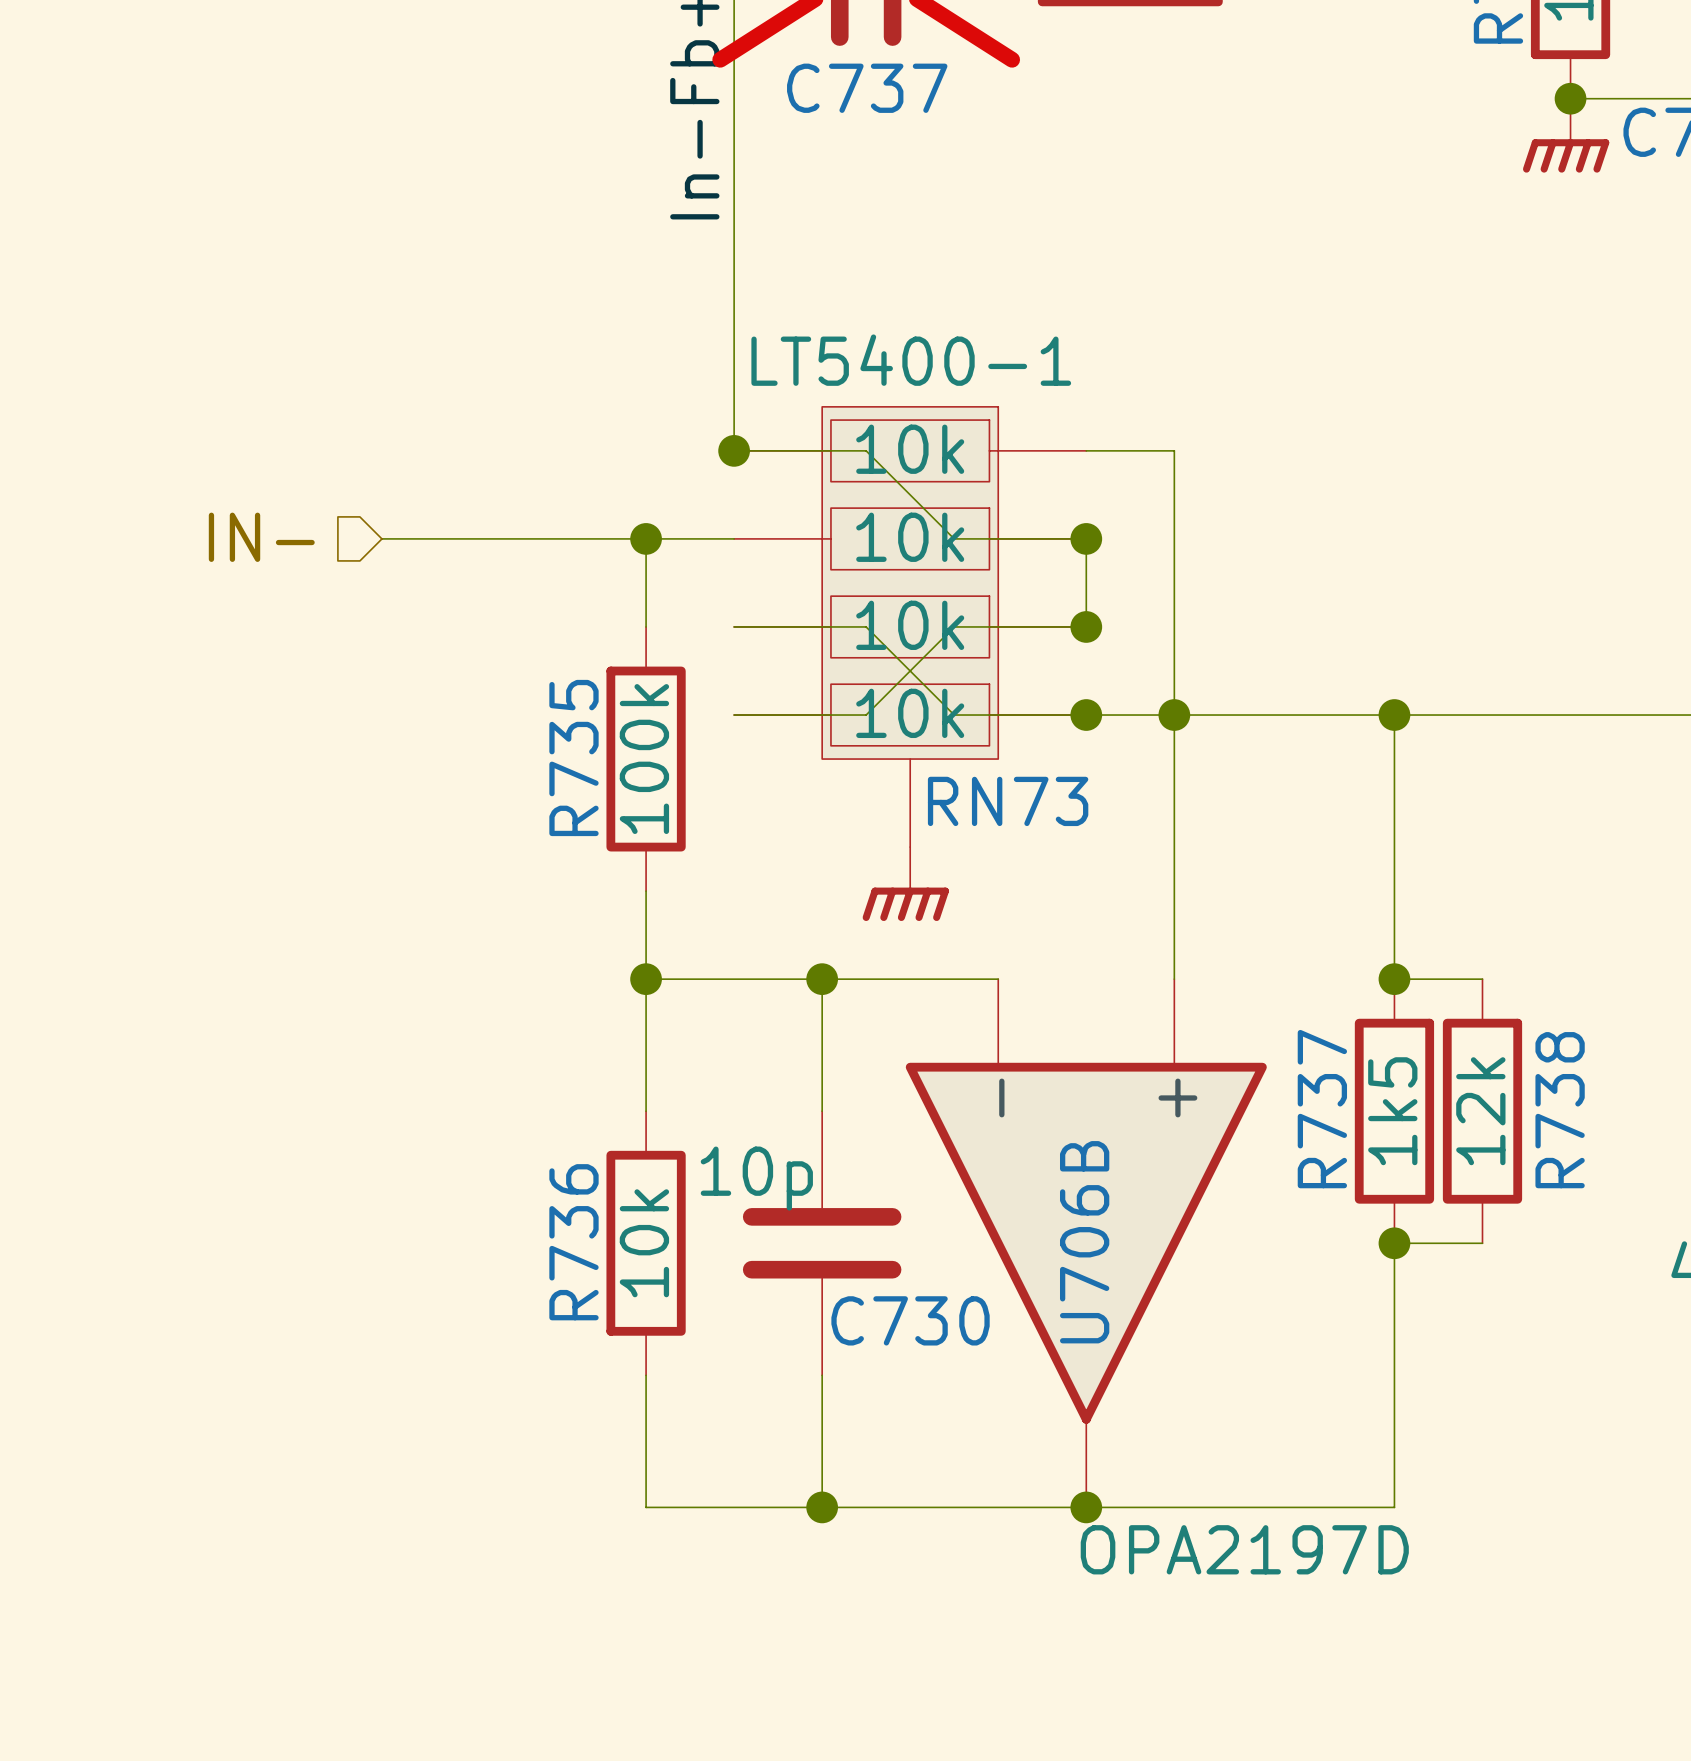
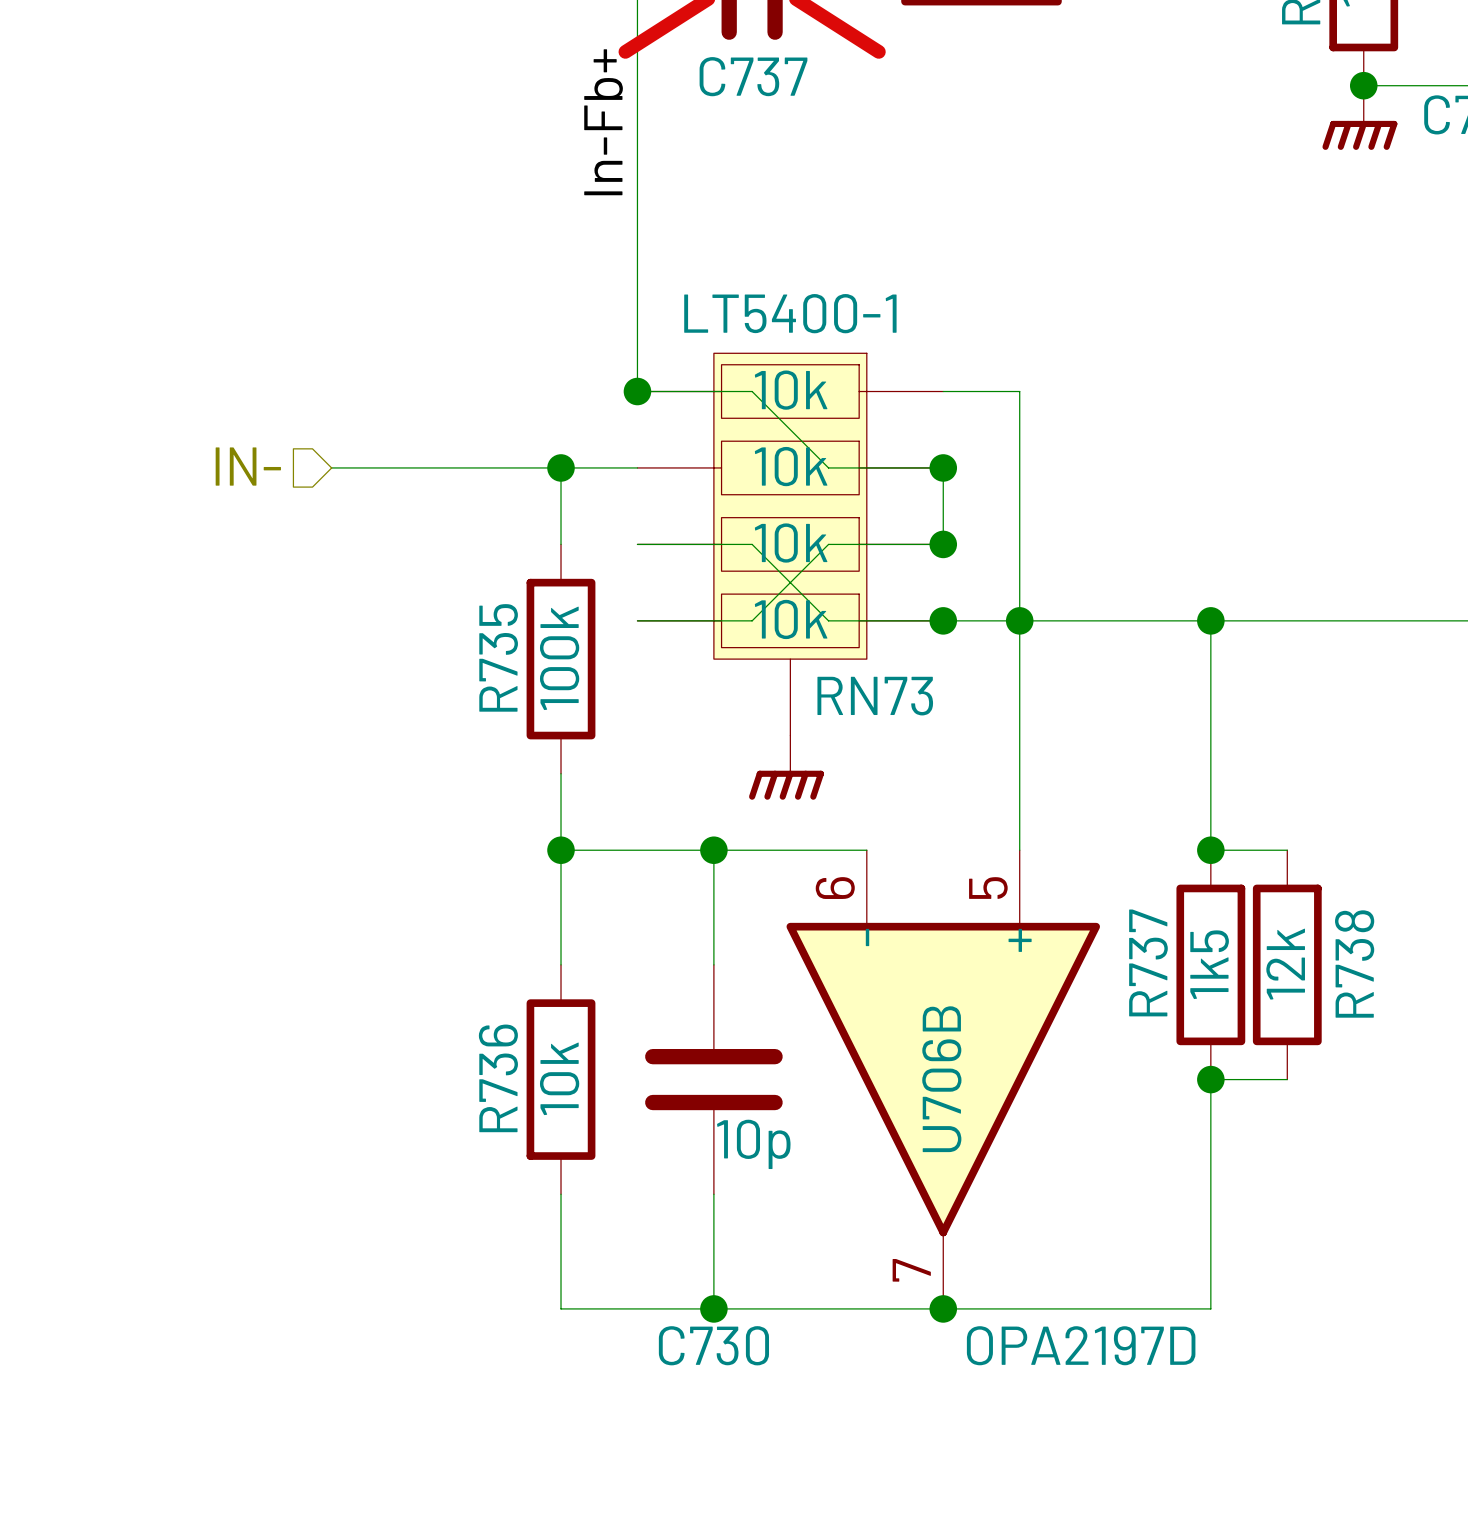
U706B pin number: none -> 6 (835, 888)
U706B pin number: none -> 5 (988, 888)
C730 value position: 10p (756, 1178) -> 10p (753, 1144)
C730 name position: C730 (910, 1320) -> C730 (713, 1345)
U706B pin number: none -> 7 (911, 1270)

